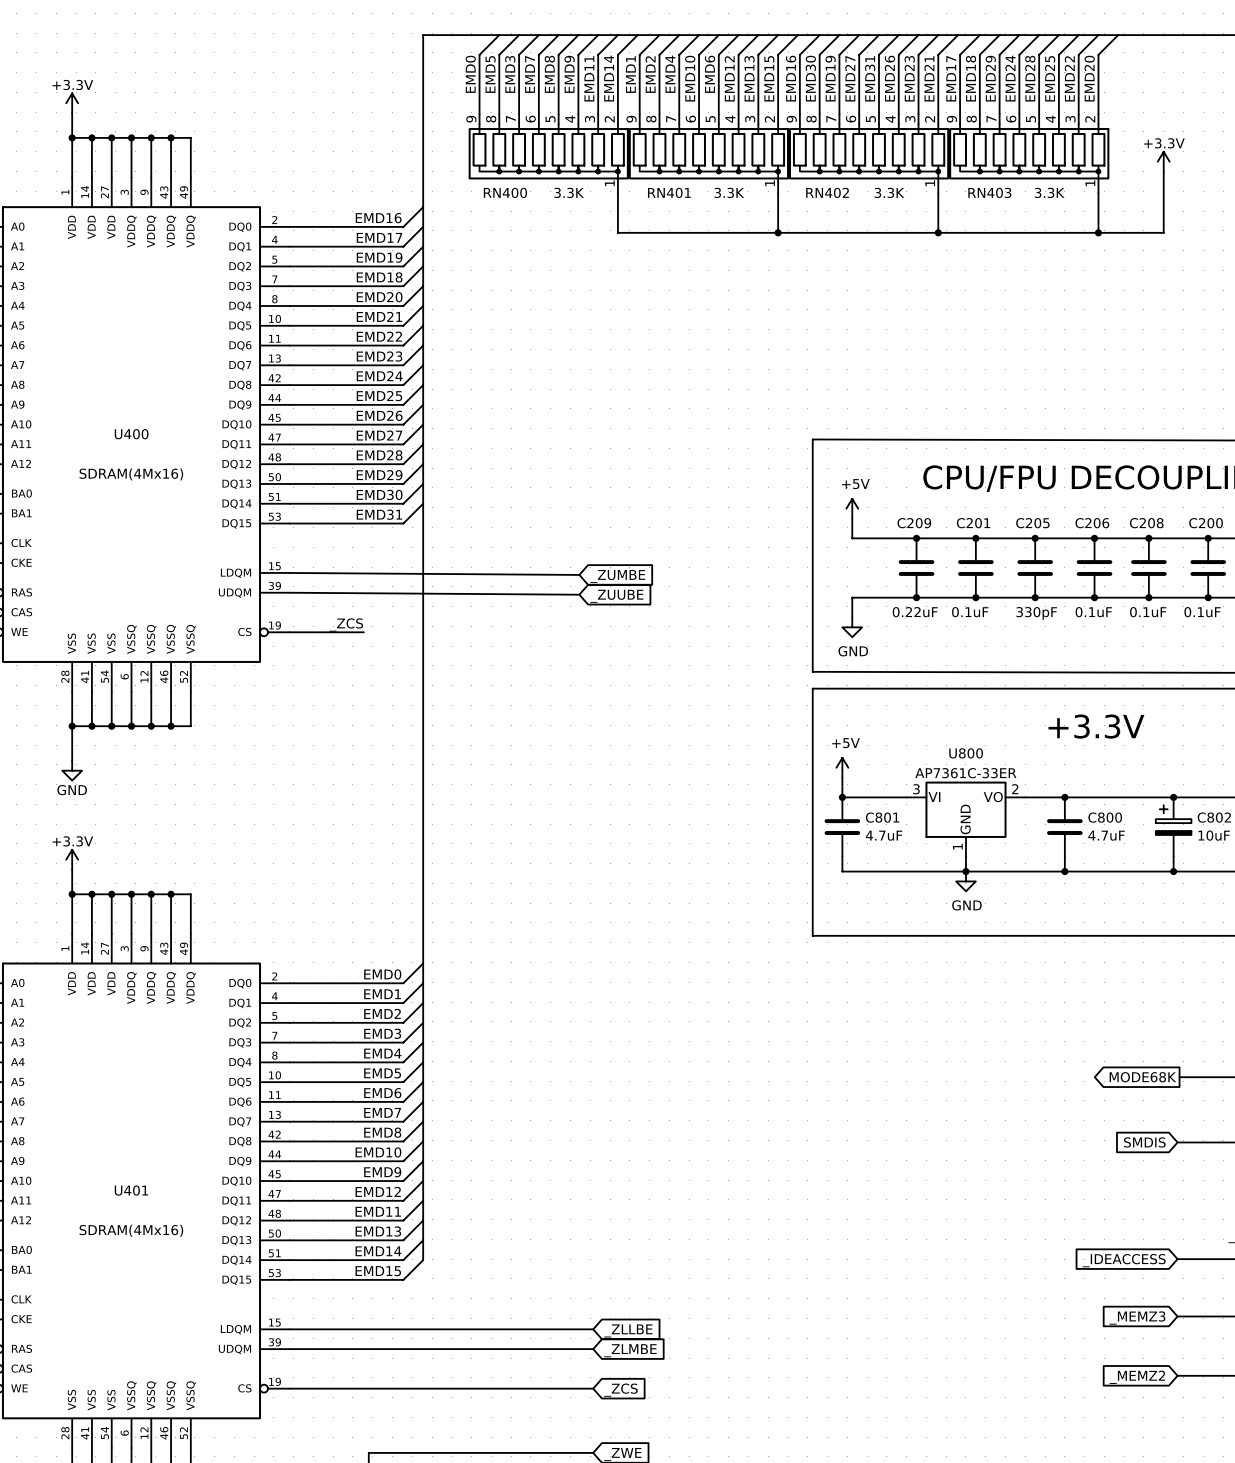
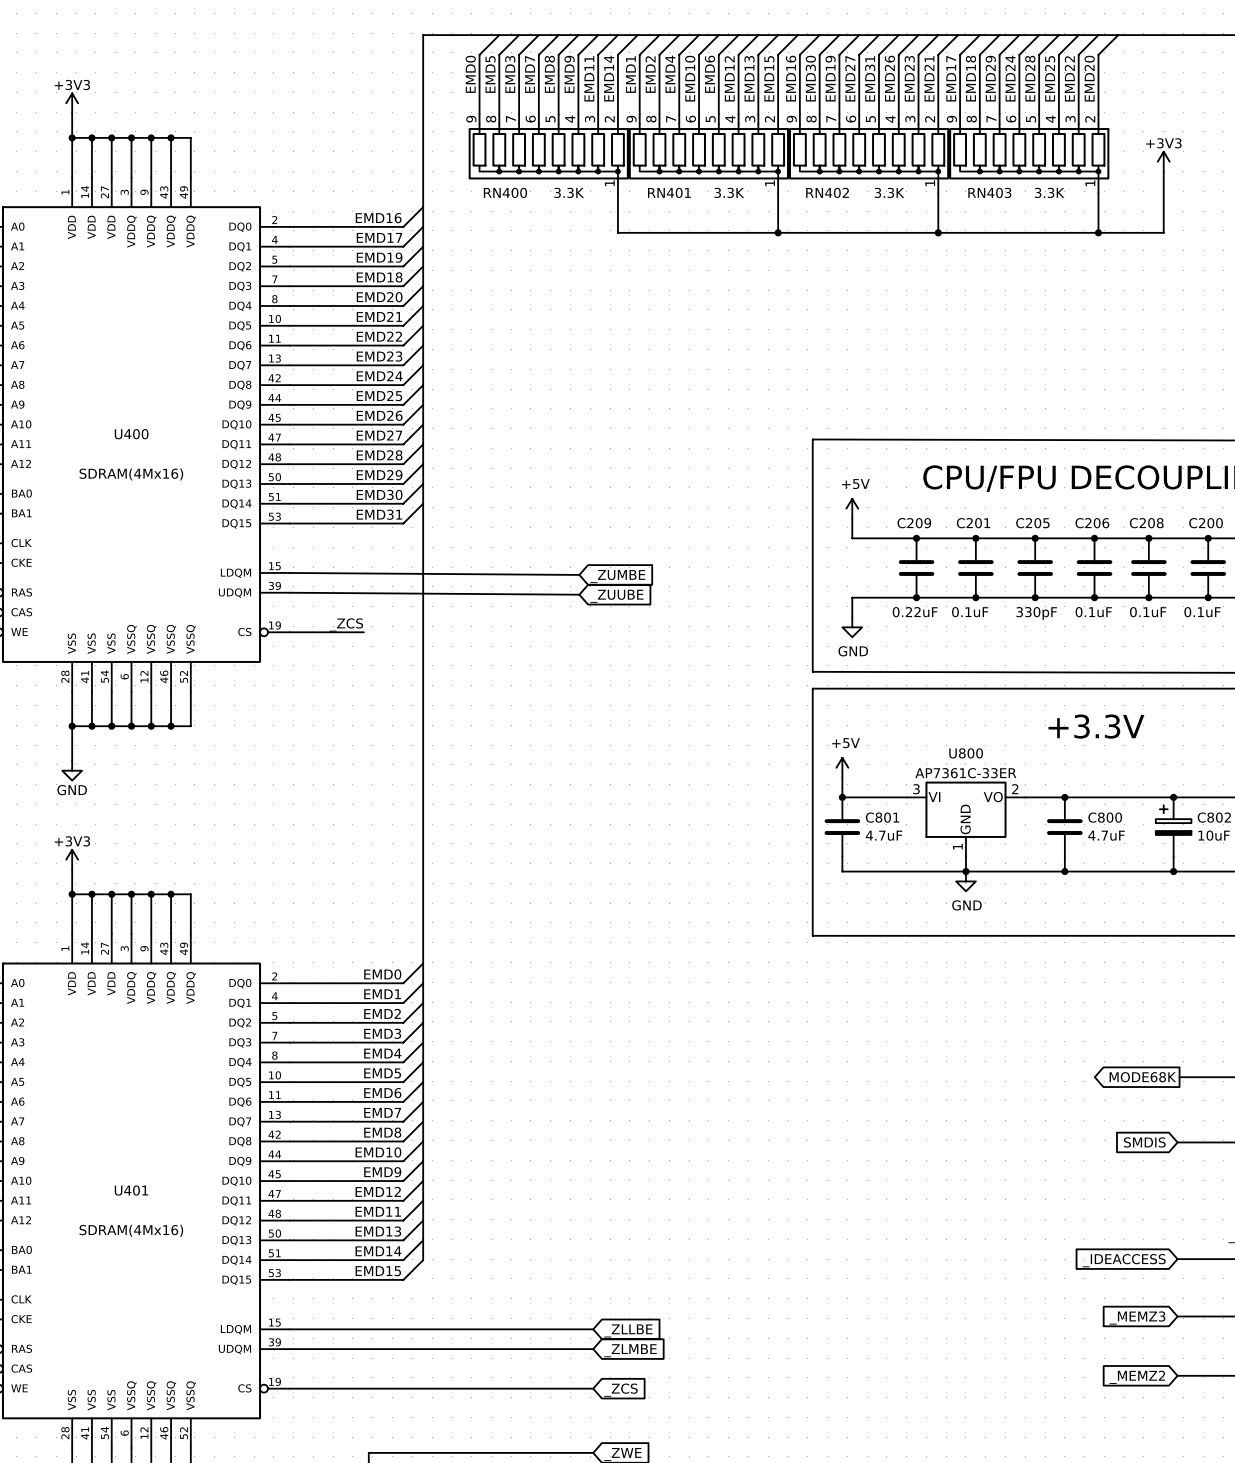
power symbol: +3.3V (72, 103) -> +3V3 (72, 103)
power symbol: +3.3V (1163, 161) -> +3V3 (1163, 161)
power symbol: +3.3V (72, 859) -> +3V3 (72, 859)

